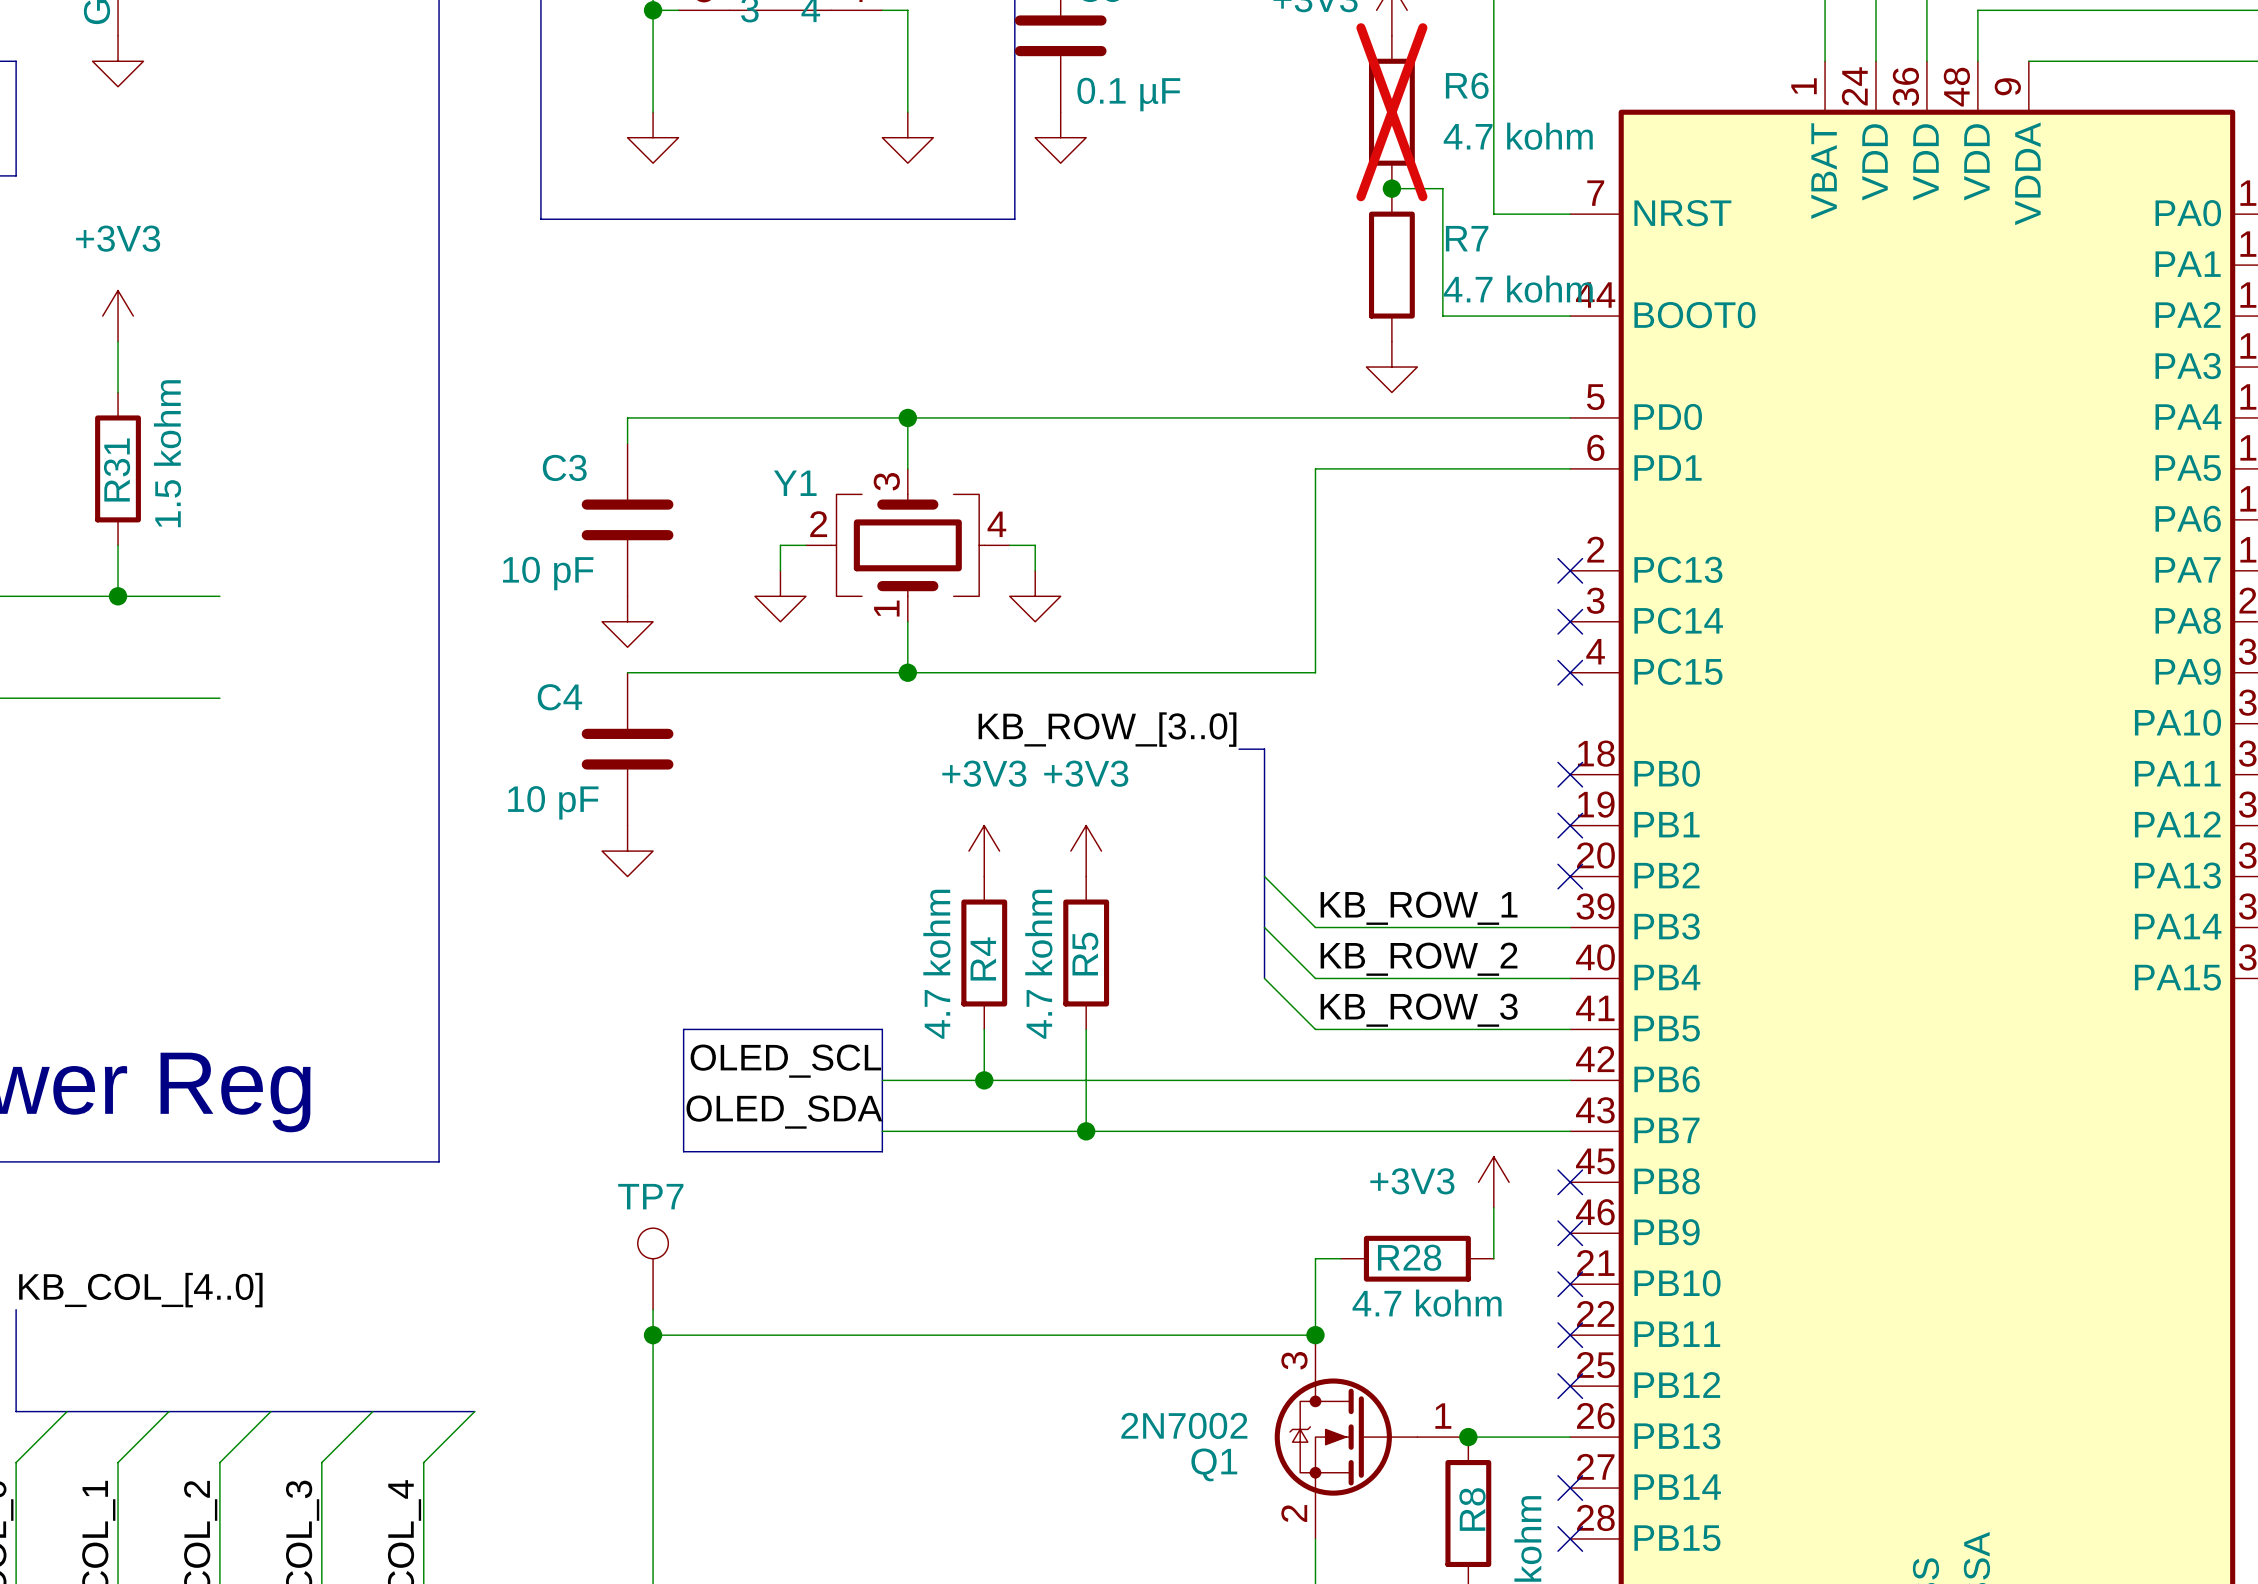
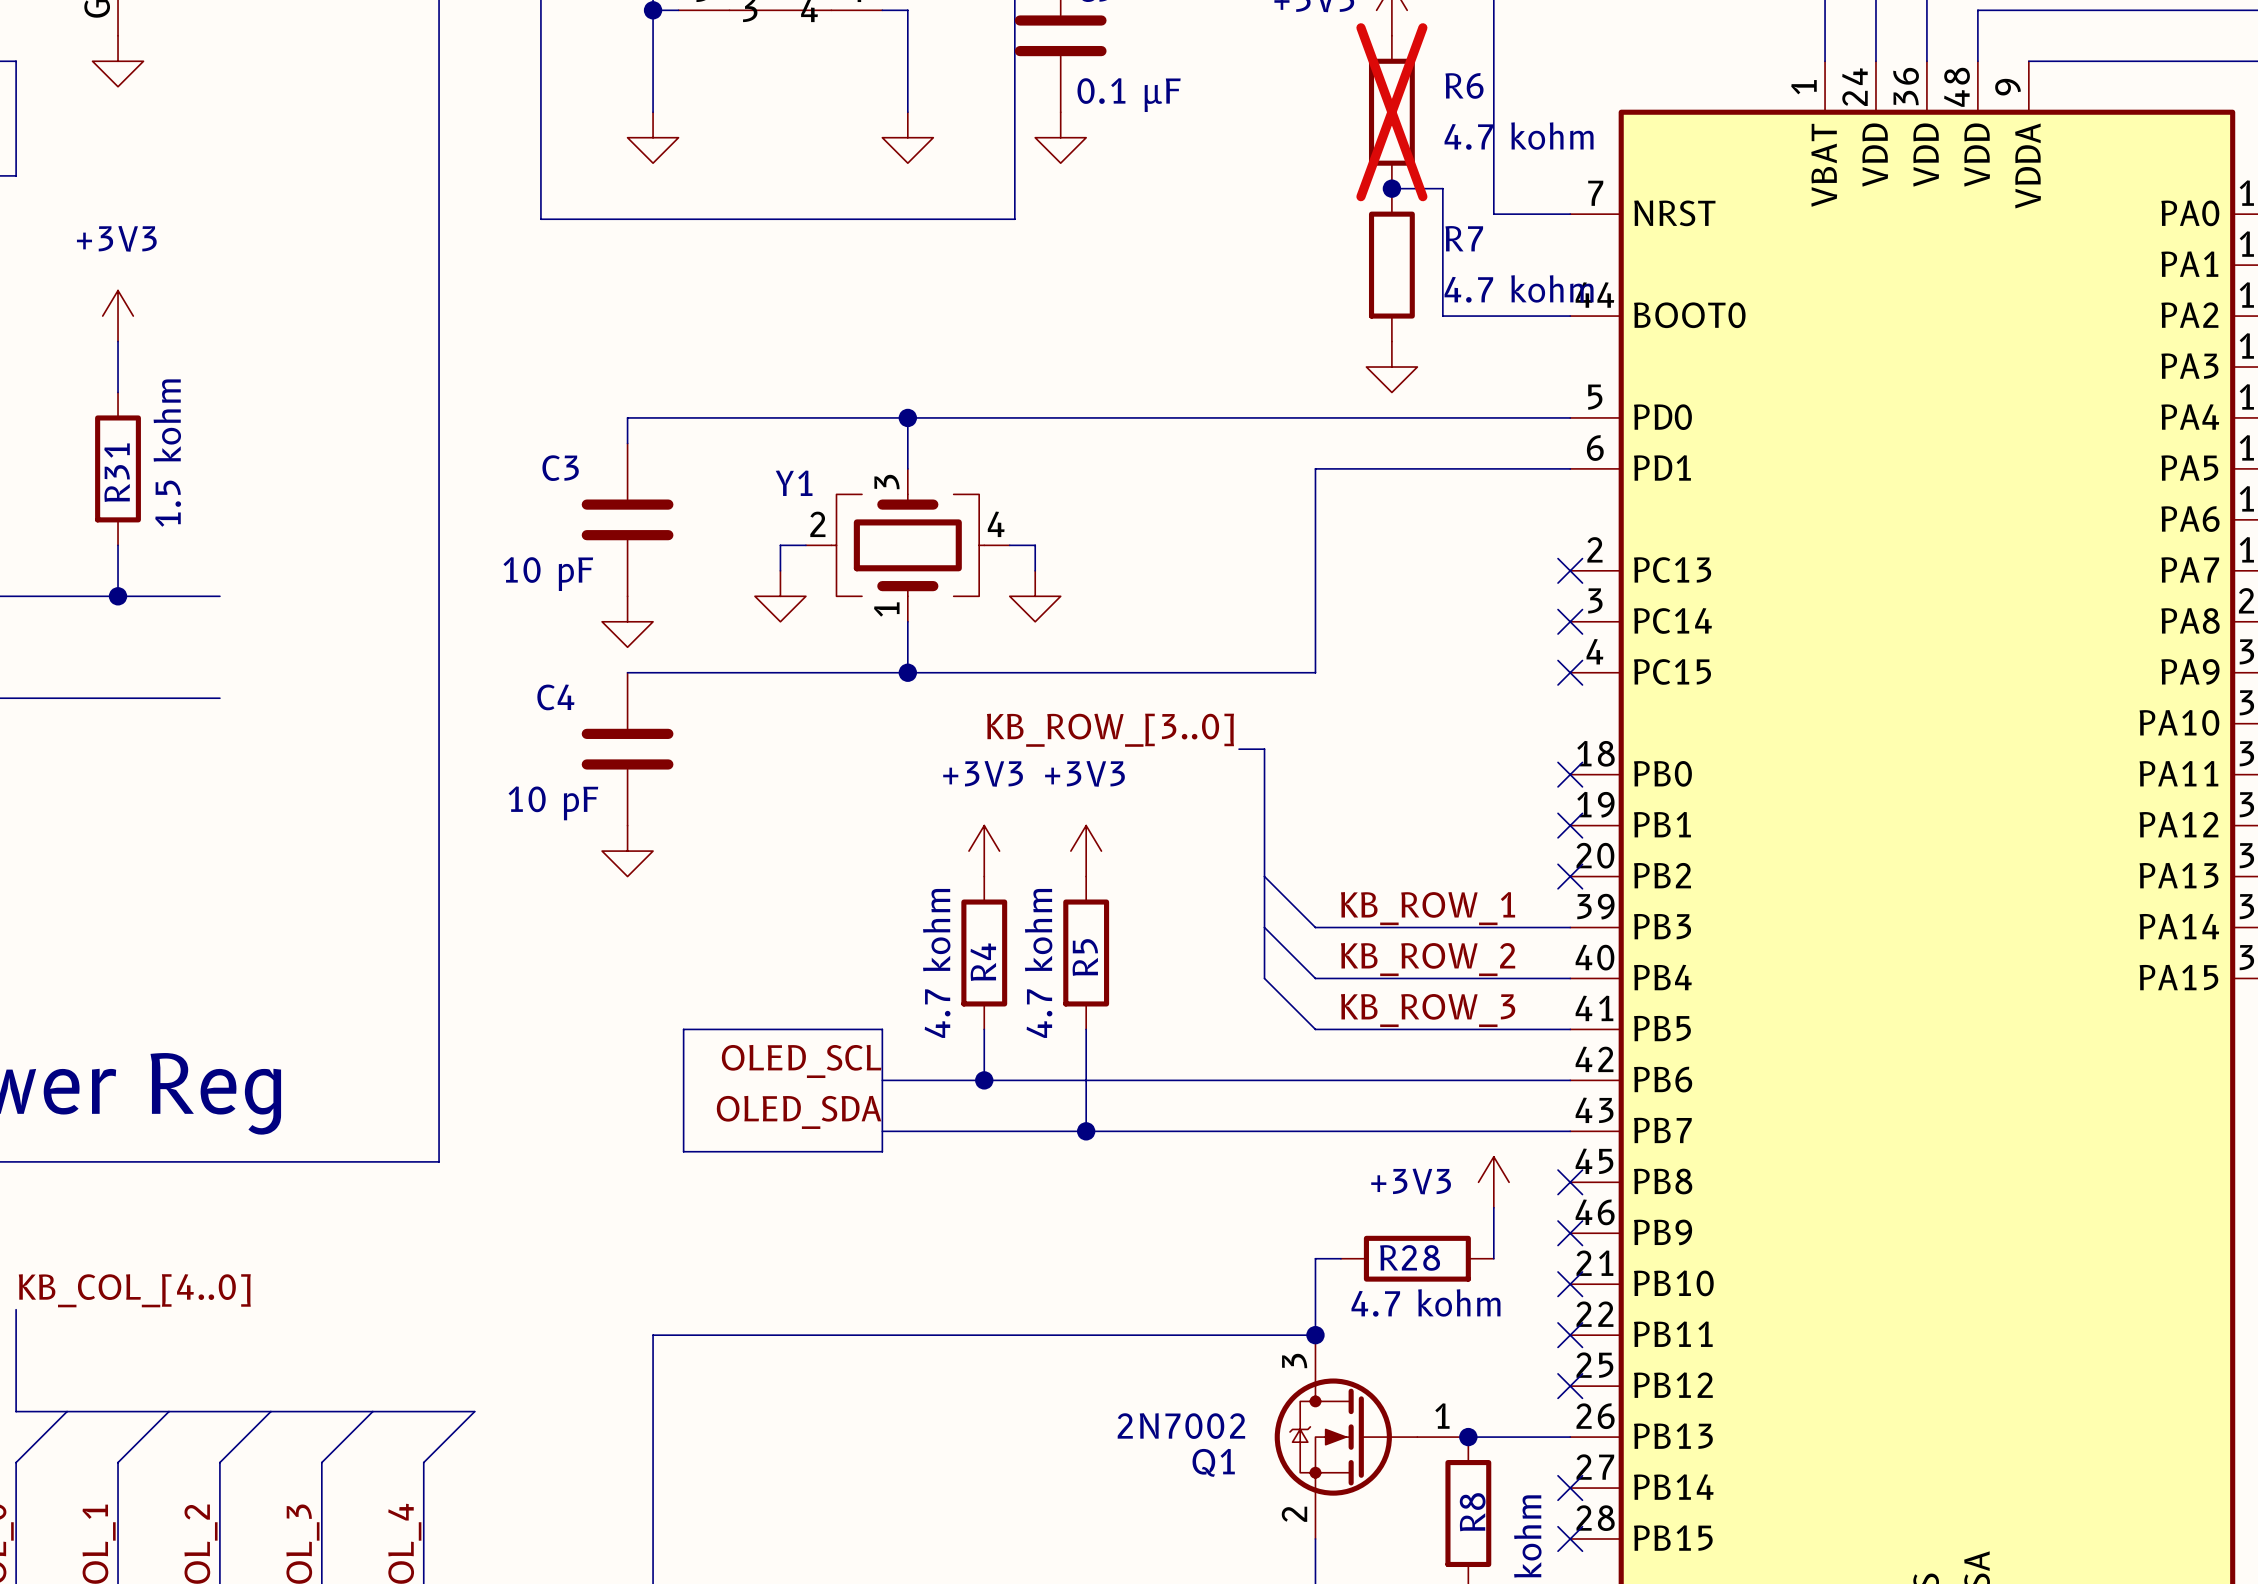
TP7: (653, 1268) -> none
wire: (653, 1309) (653, 1335) -> none
junction: (653, 1335) -> none

